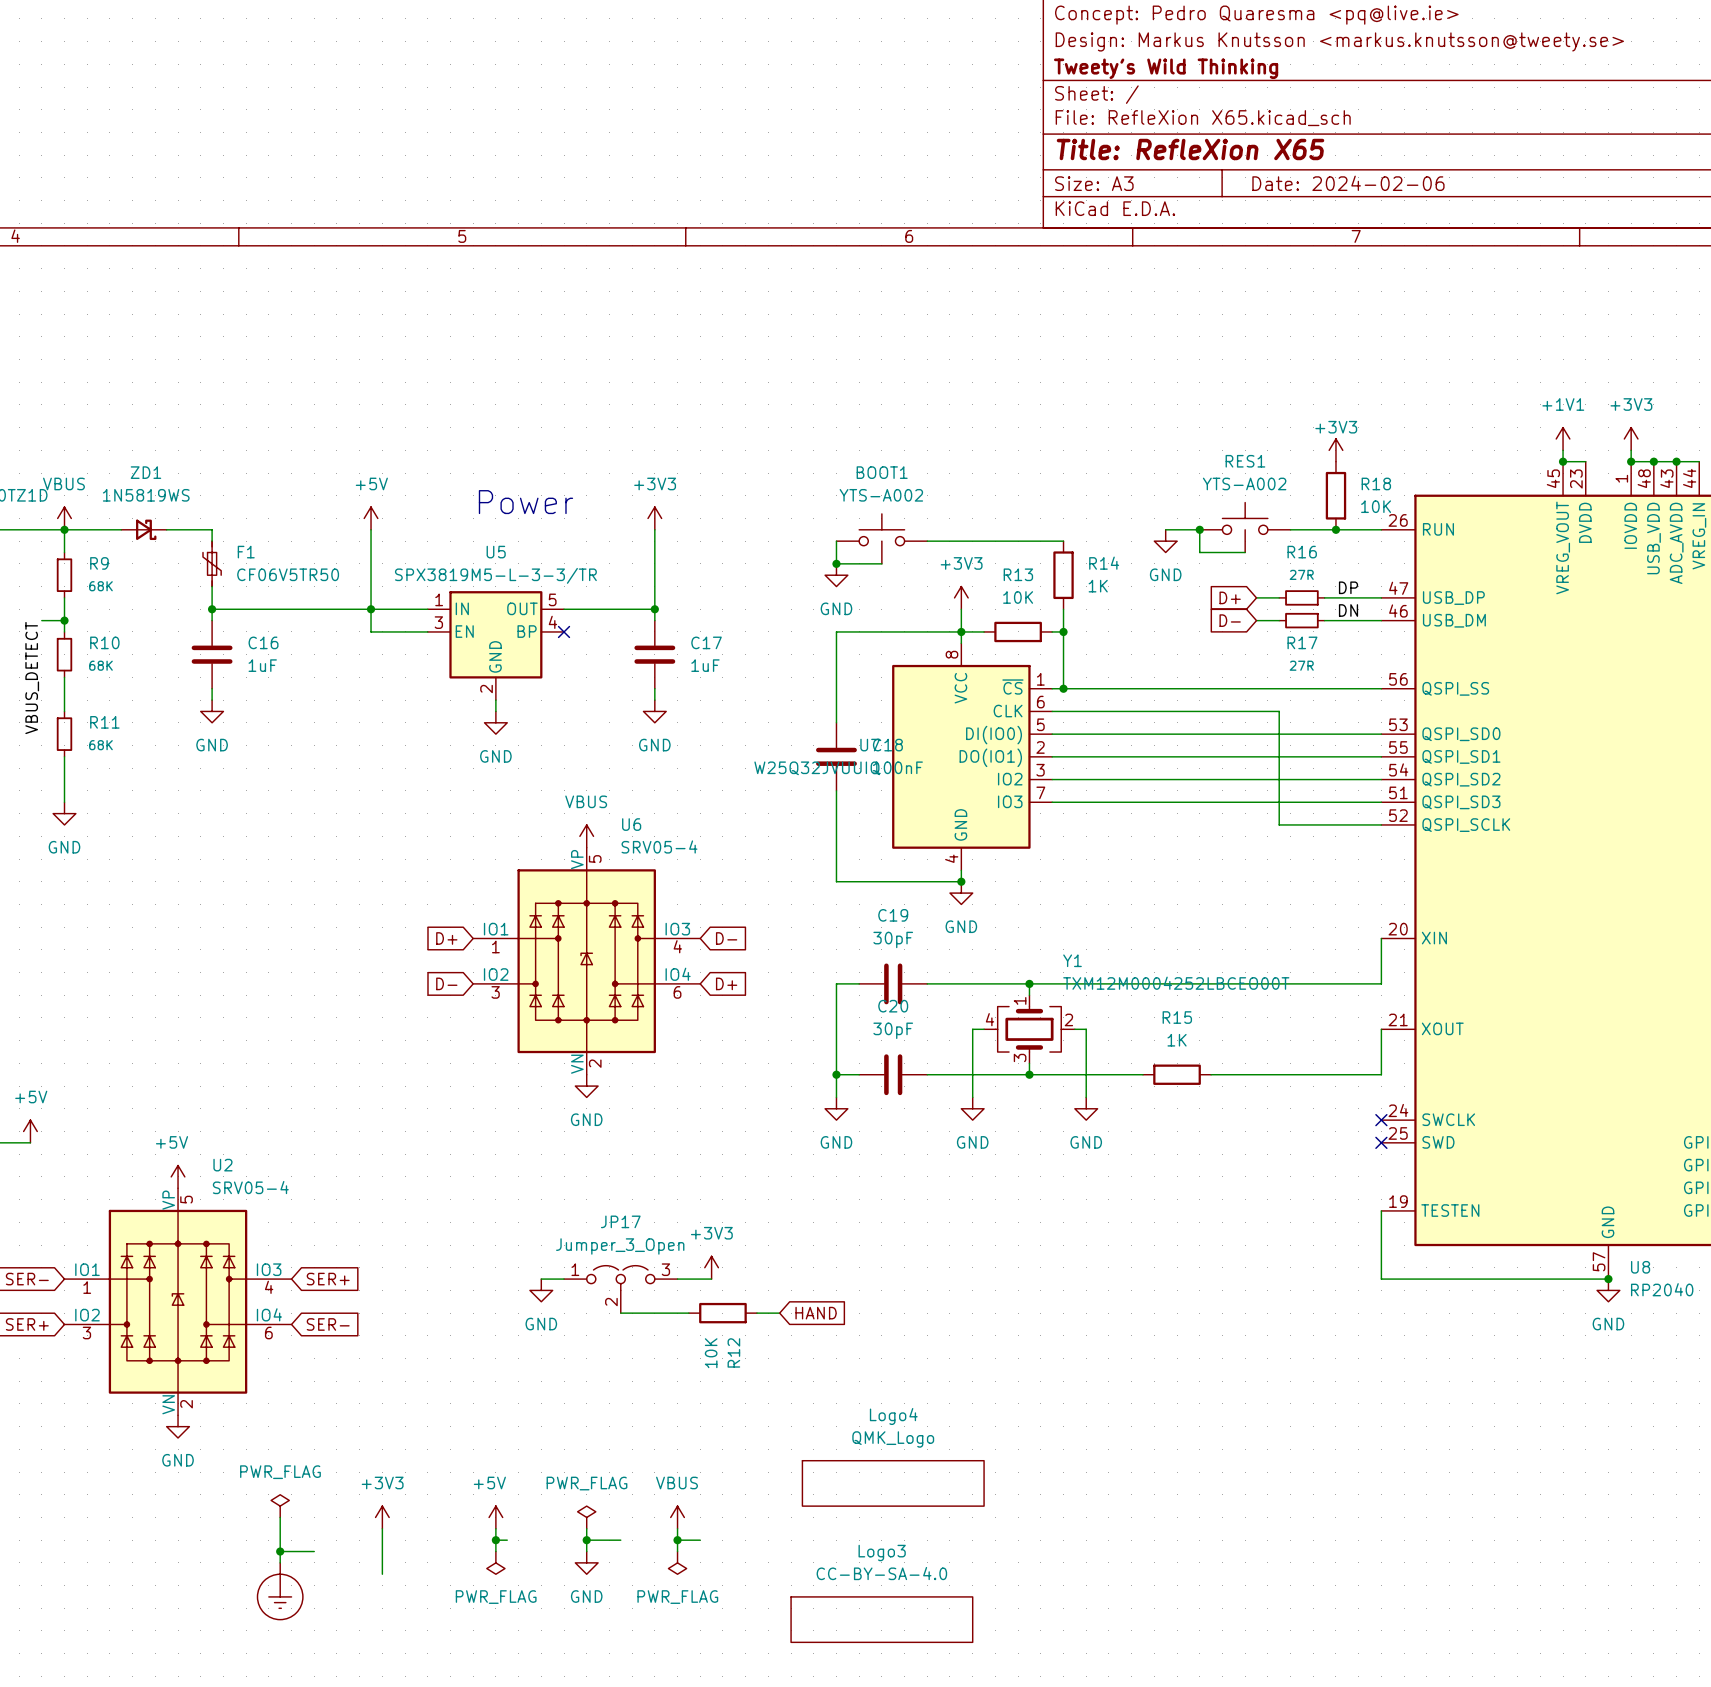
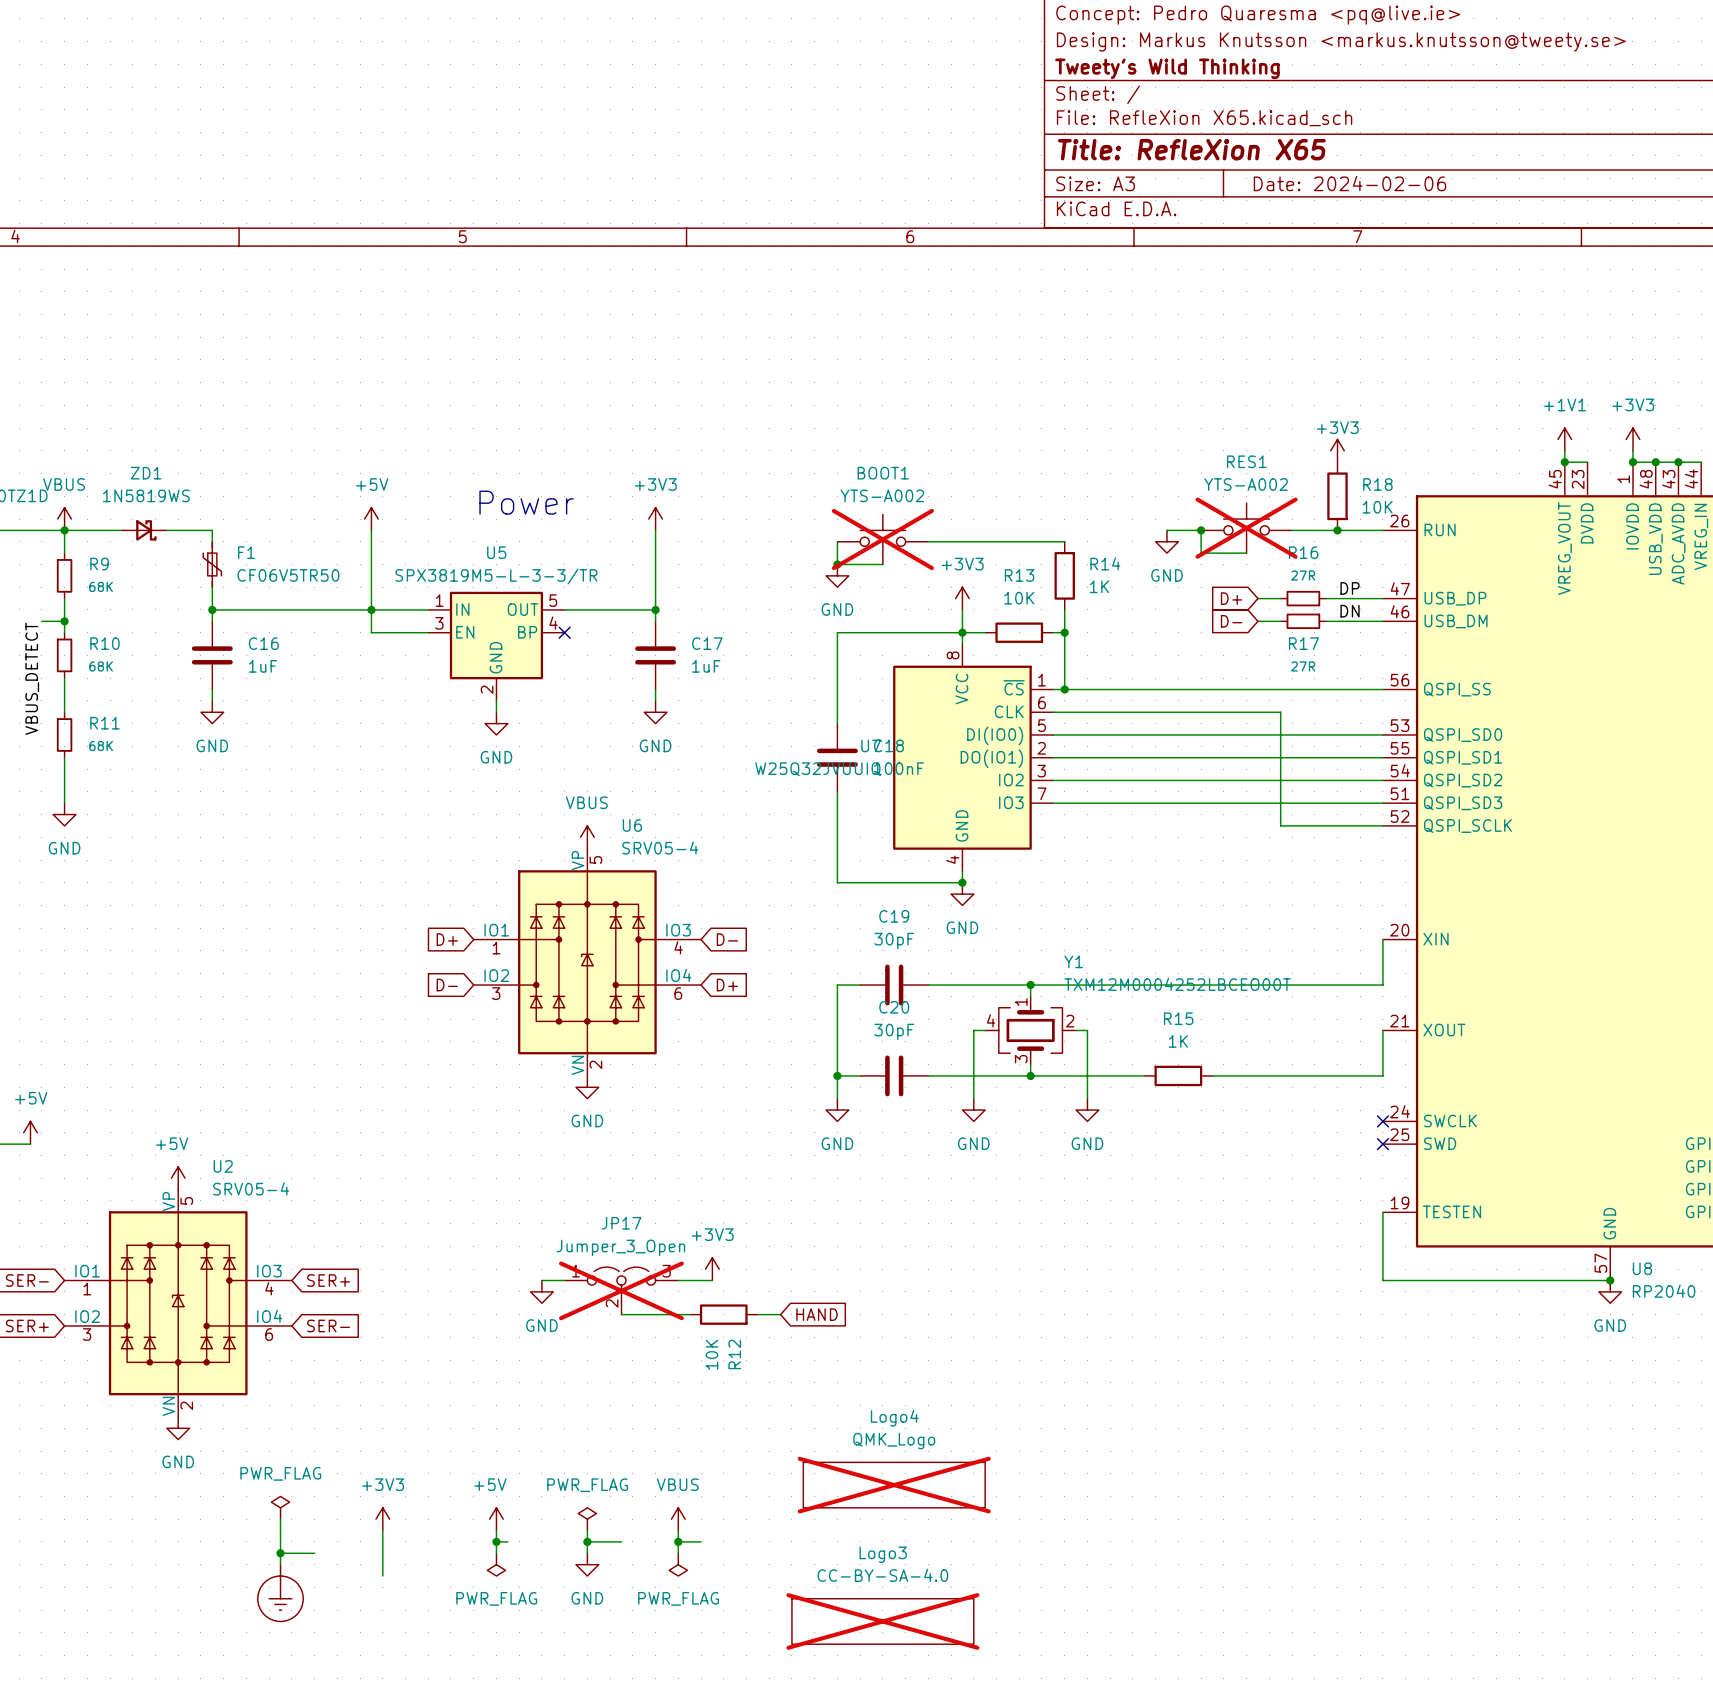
RES1 do-not-place cross: none -> (1246, 528)
BOOT1 do-not-place cross: none -> (882, 539)
JP17 do-not-place cross: none -> (621, 1290)
Logo4 do-not-place cross: none -> (894, 1485)
Logo3 do-not-place cross: none -> (882, 1621)

